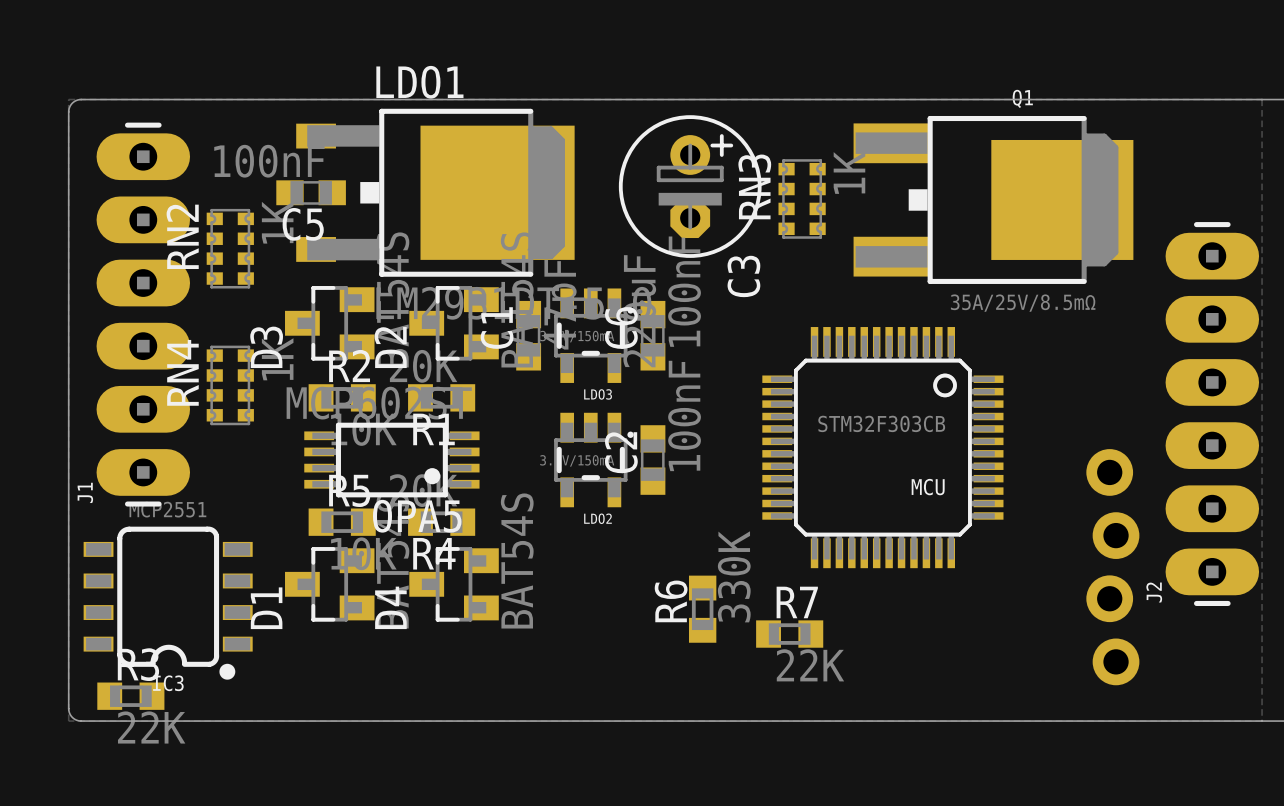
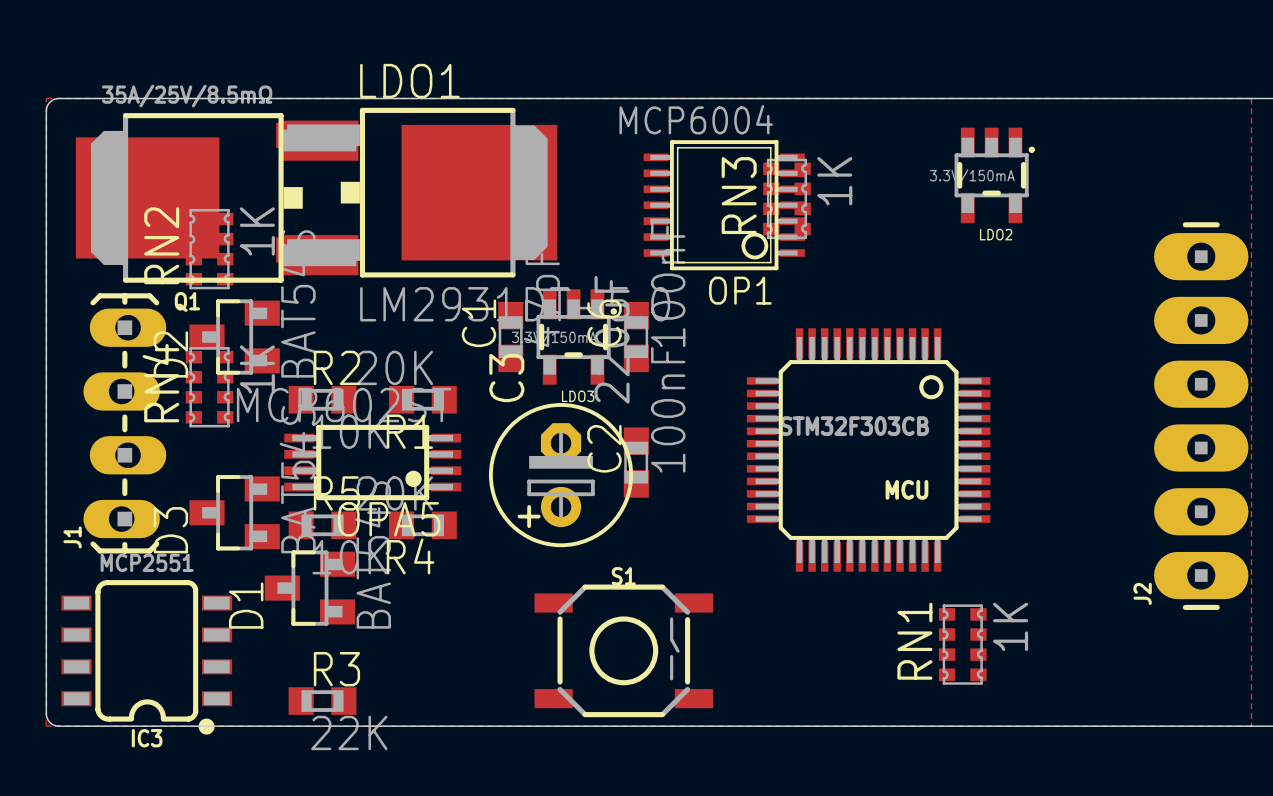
J1 footprint: [96, 122, 191, 507] -> [83, 293, 167, 554]
C3 rotation: 0° (690, 186) -> 180° (561, 475)
C3 position: (690, 186) -> (561, 475)
C5: 100nF (311, 192) -> none
Q1 rotation: 0° (993, 199) -> 180° (217, 197)
Q1 position: (993, 199) -> (217, 197)
OP1: none -> MCP6004 (724, 205)
D3 position: (329, 323) -> (234, 512)
D2 position: (454, 323) -> (234, 337)
LDO2 position: (593, 460) -> (994, 175)
J1 name position: J1 (85, 492) -> J1 (72, 537)
part: (1112, 567) -> none
D4: BAT54S (454, 584) -> none
IC3 position: (168, 603) -> (146, 657)
R6: 330K (702, 609) -> none
R7: 22K (789, 634) -> none
RN1: none -> 1K (962, 644)
S1: none -> (623, 650)
R3 position: (130, 696) -> (322, 701)

